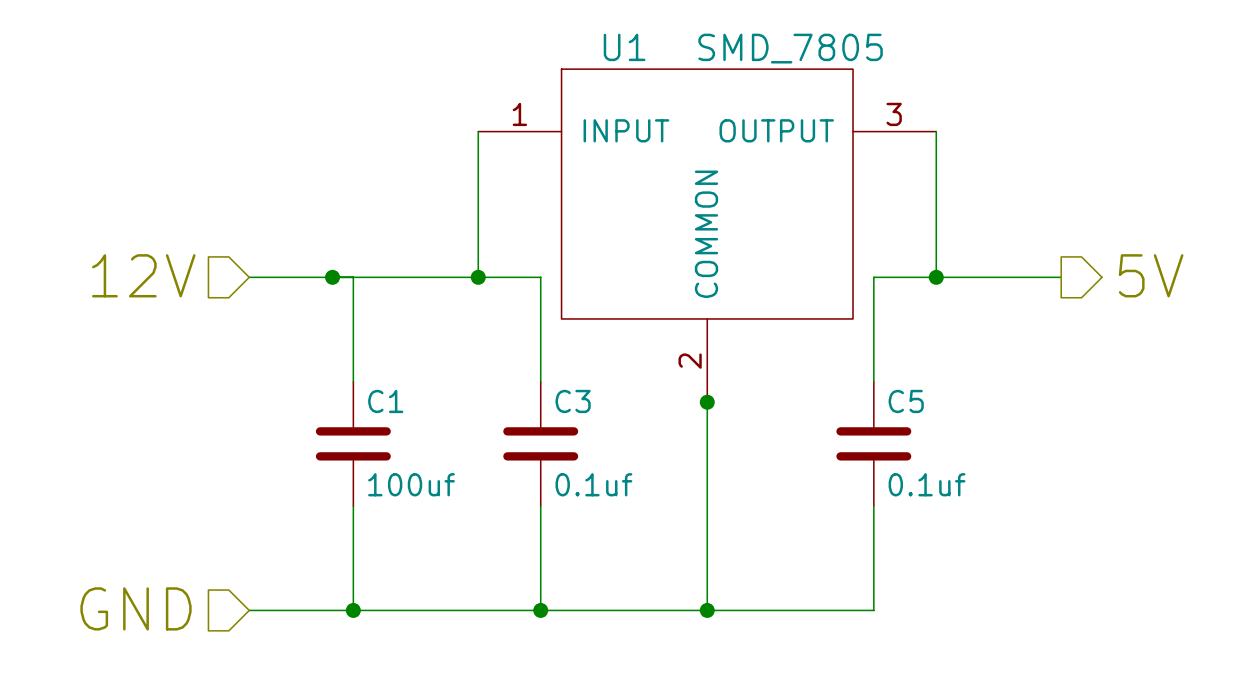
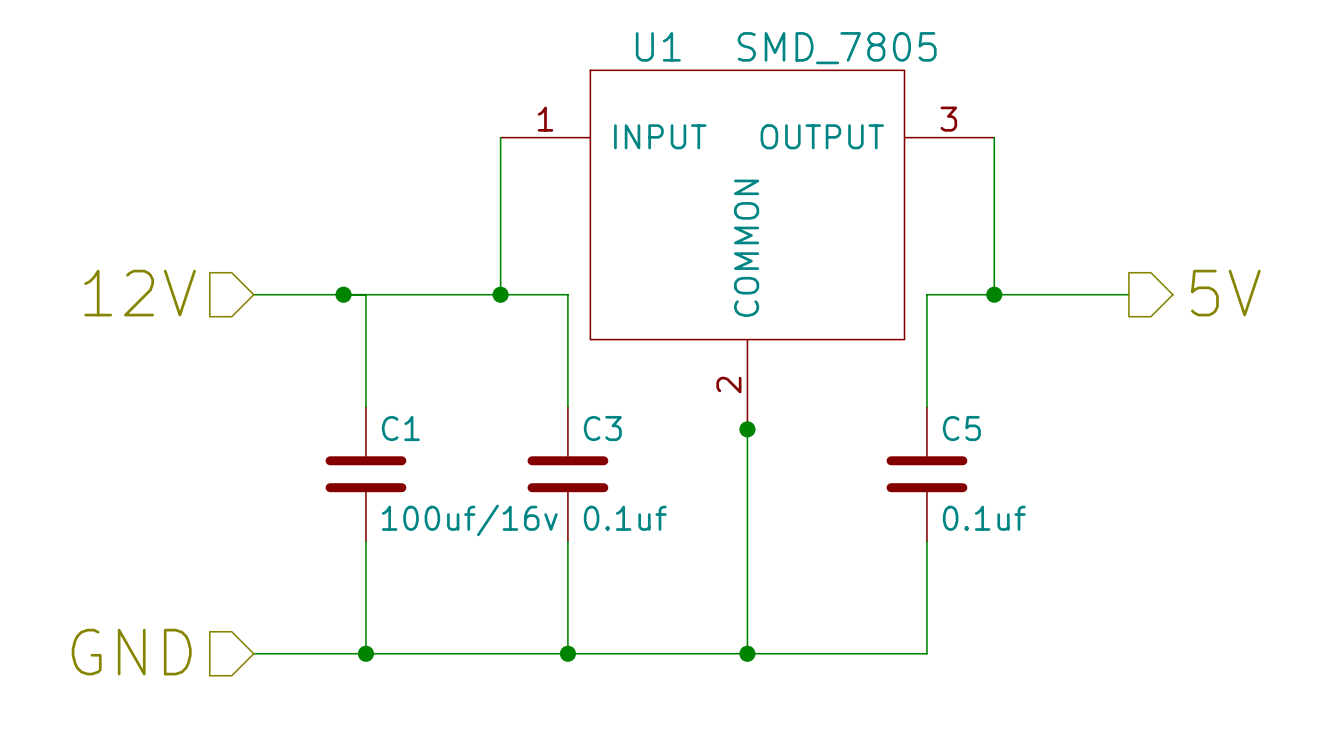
C1 value: 100uf (411, 484) -> 100uf/16v (469, 520)

